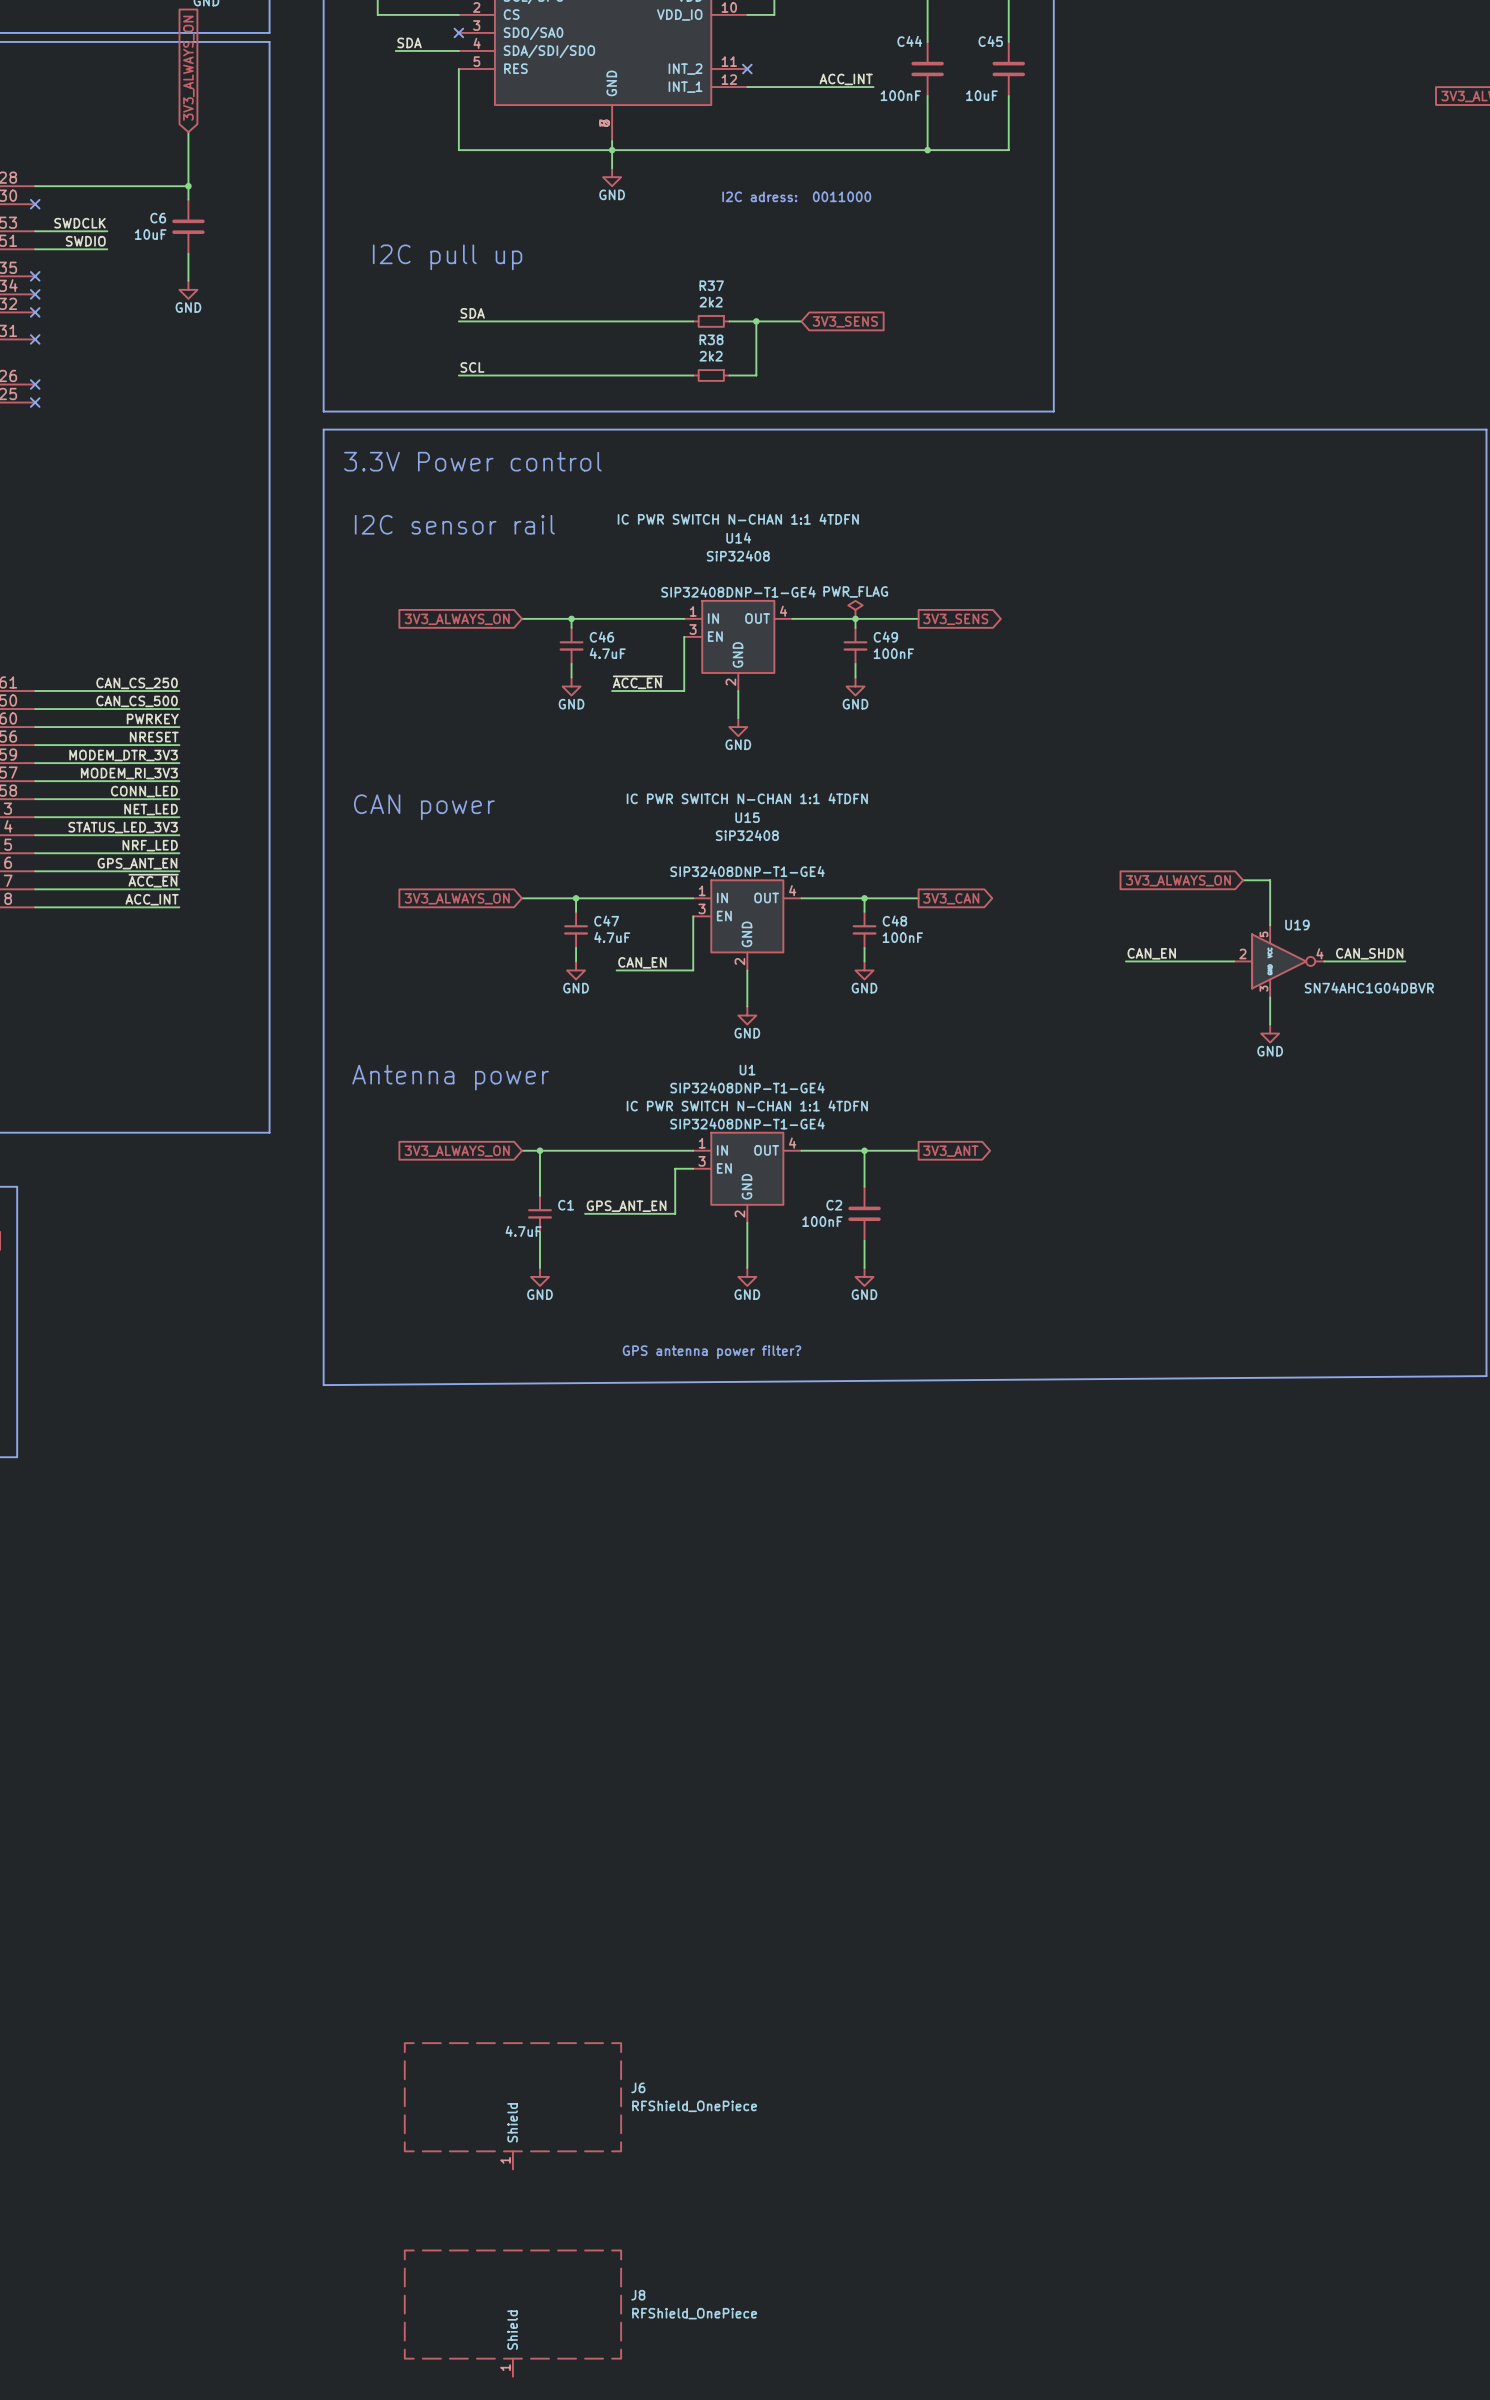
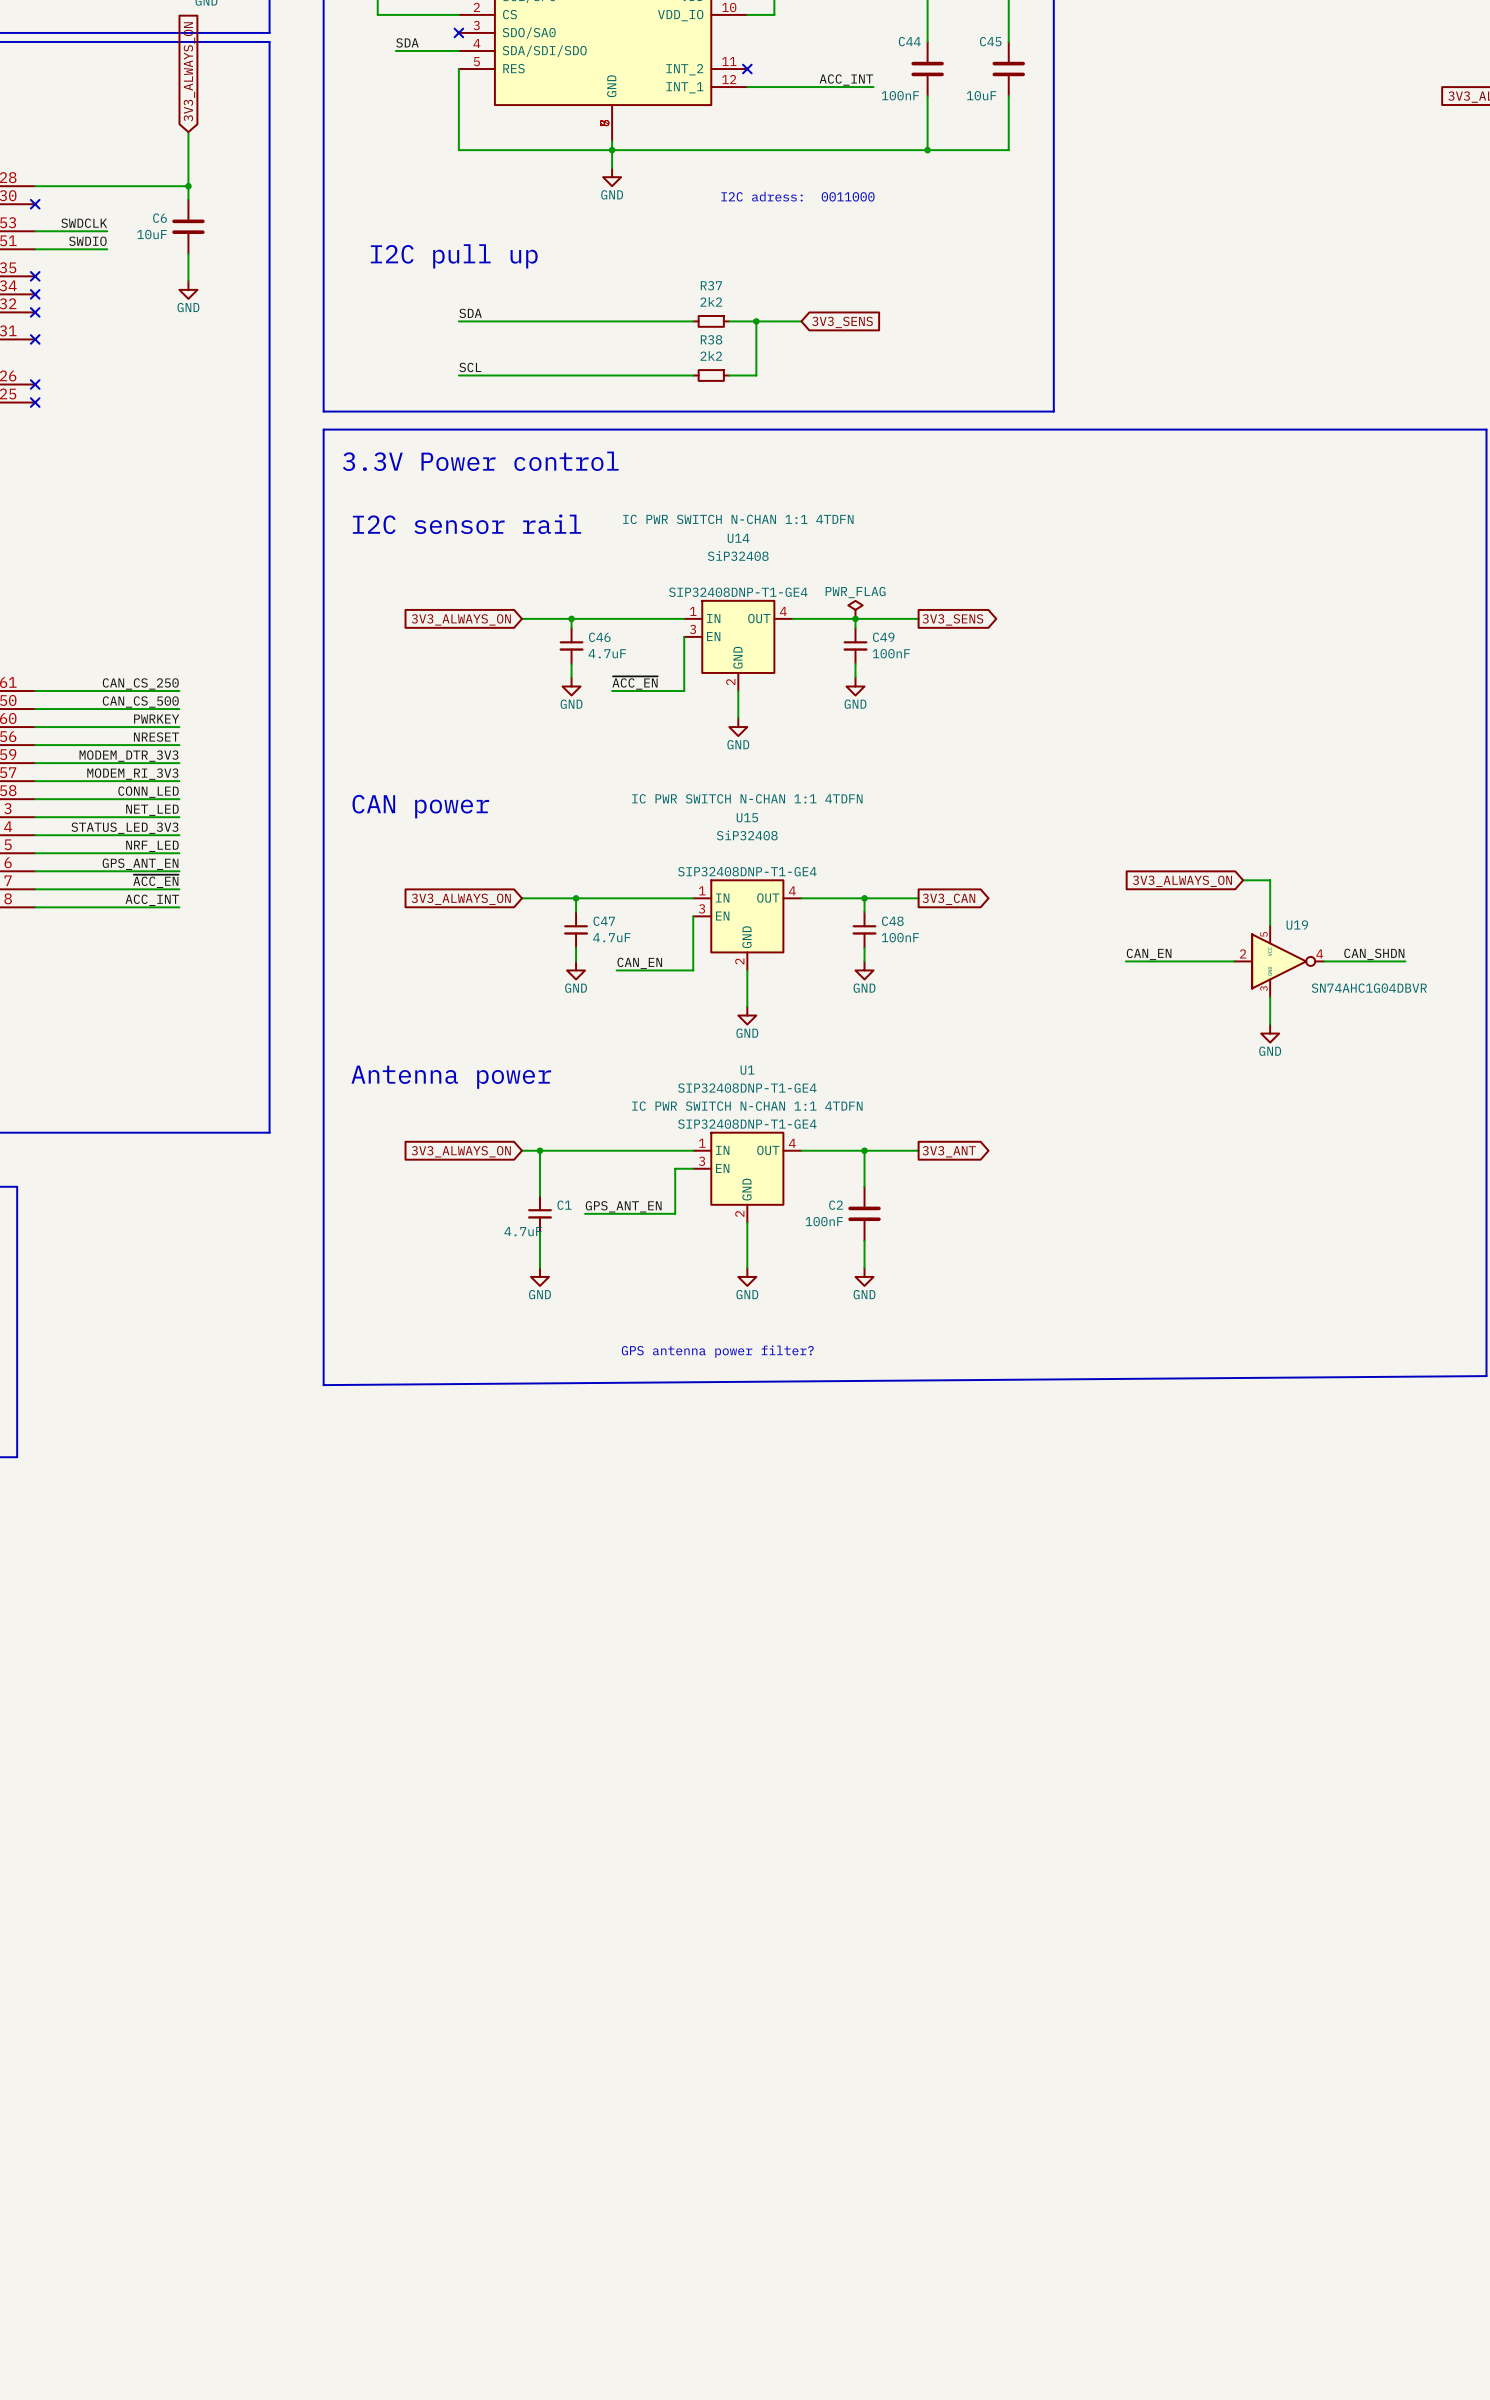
J6: RFShield_OnePiece (512, 2105) -> none
J8: RFShield_OnePiece (512, 2313) -> none

